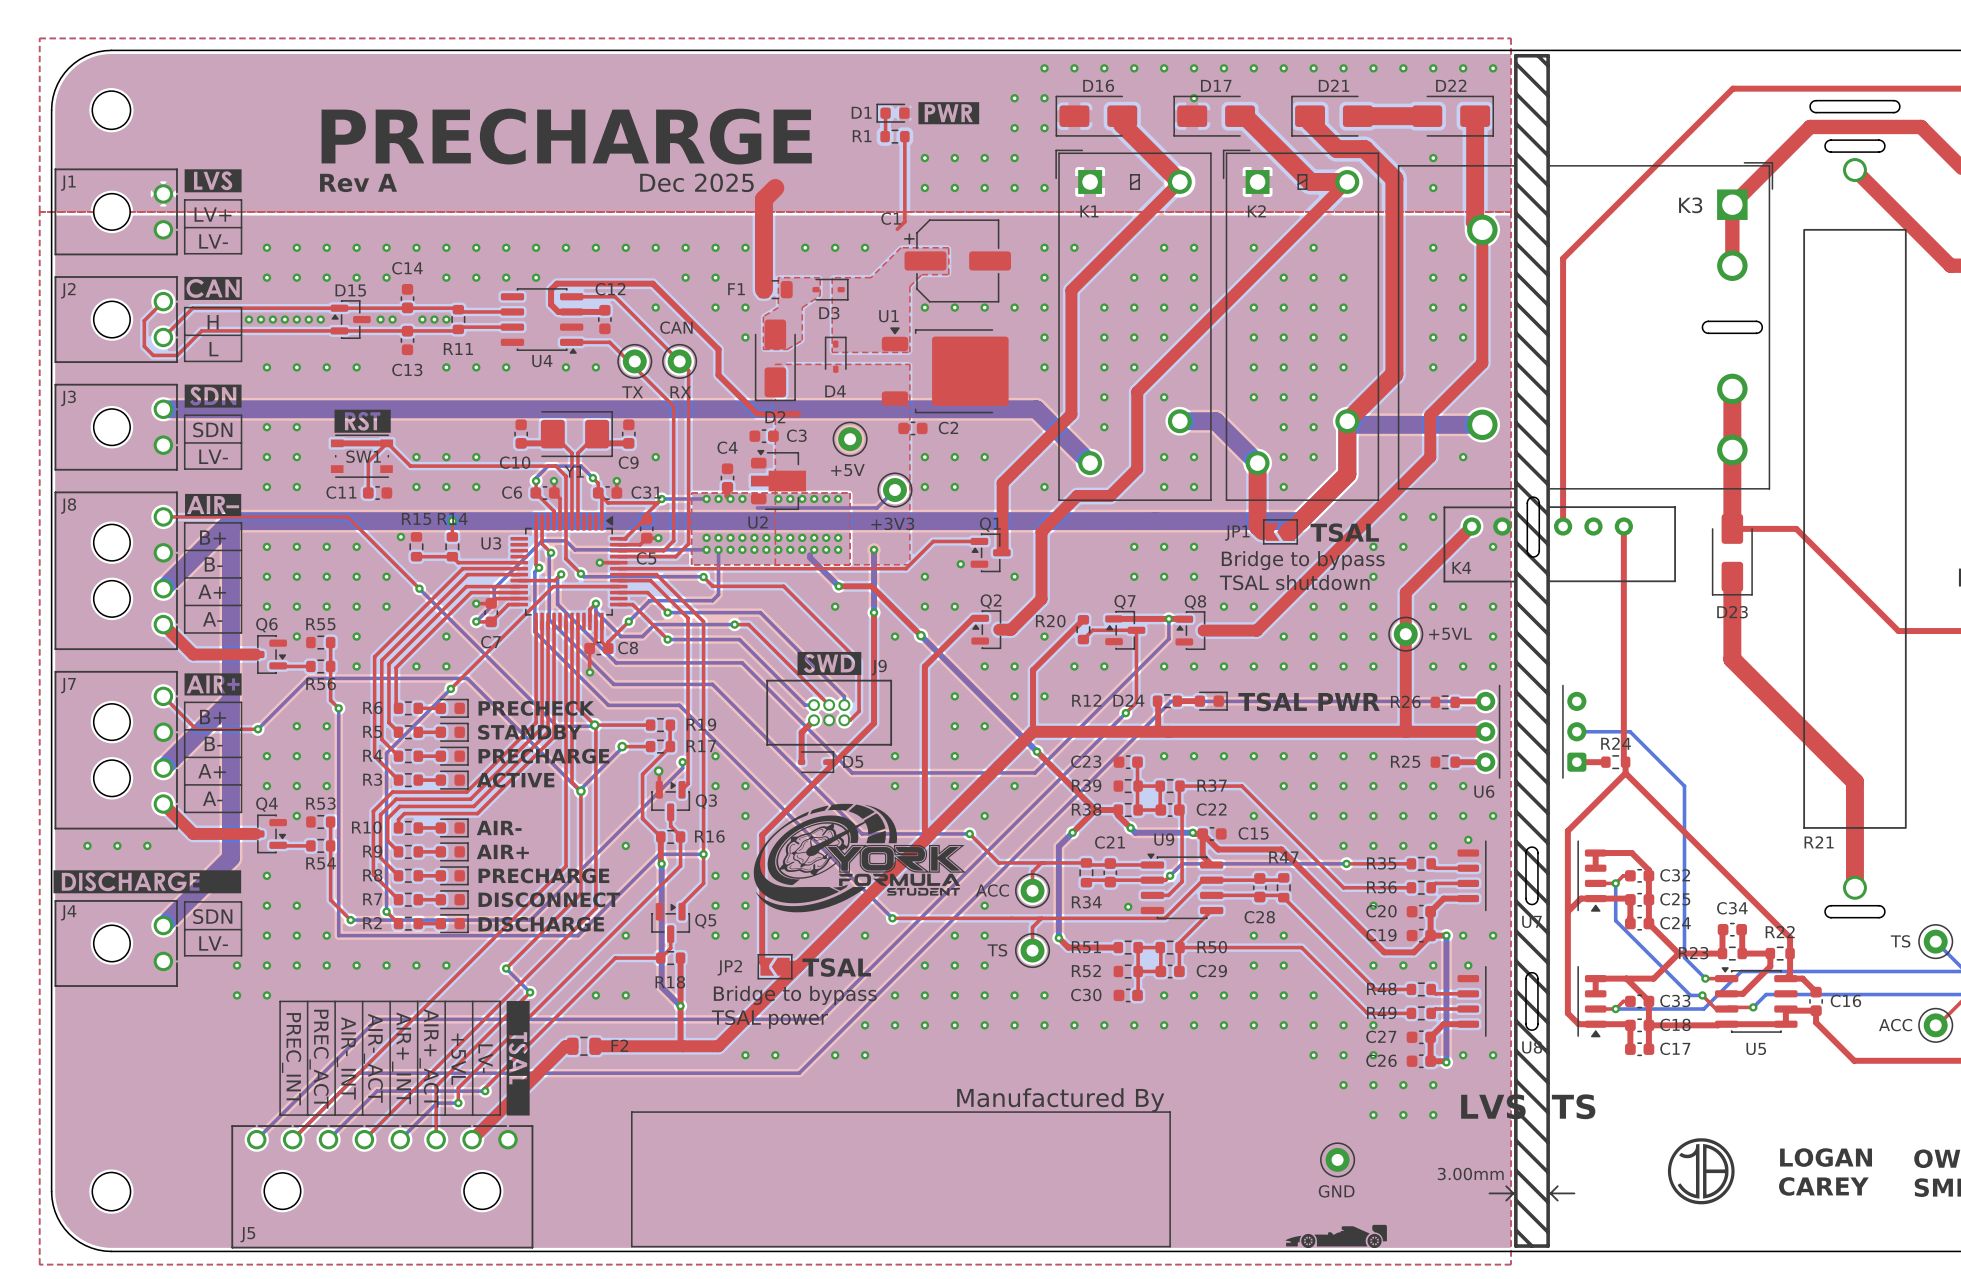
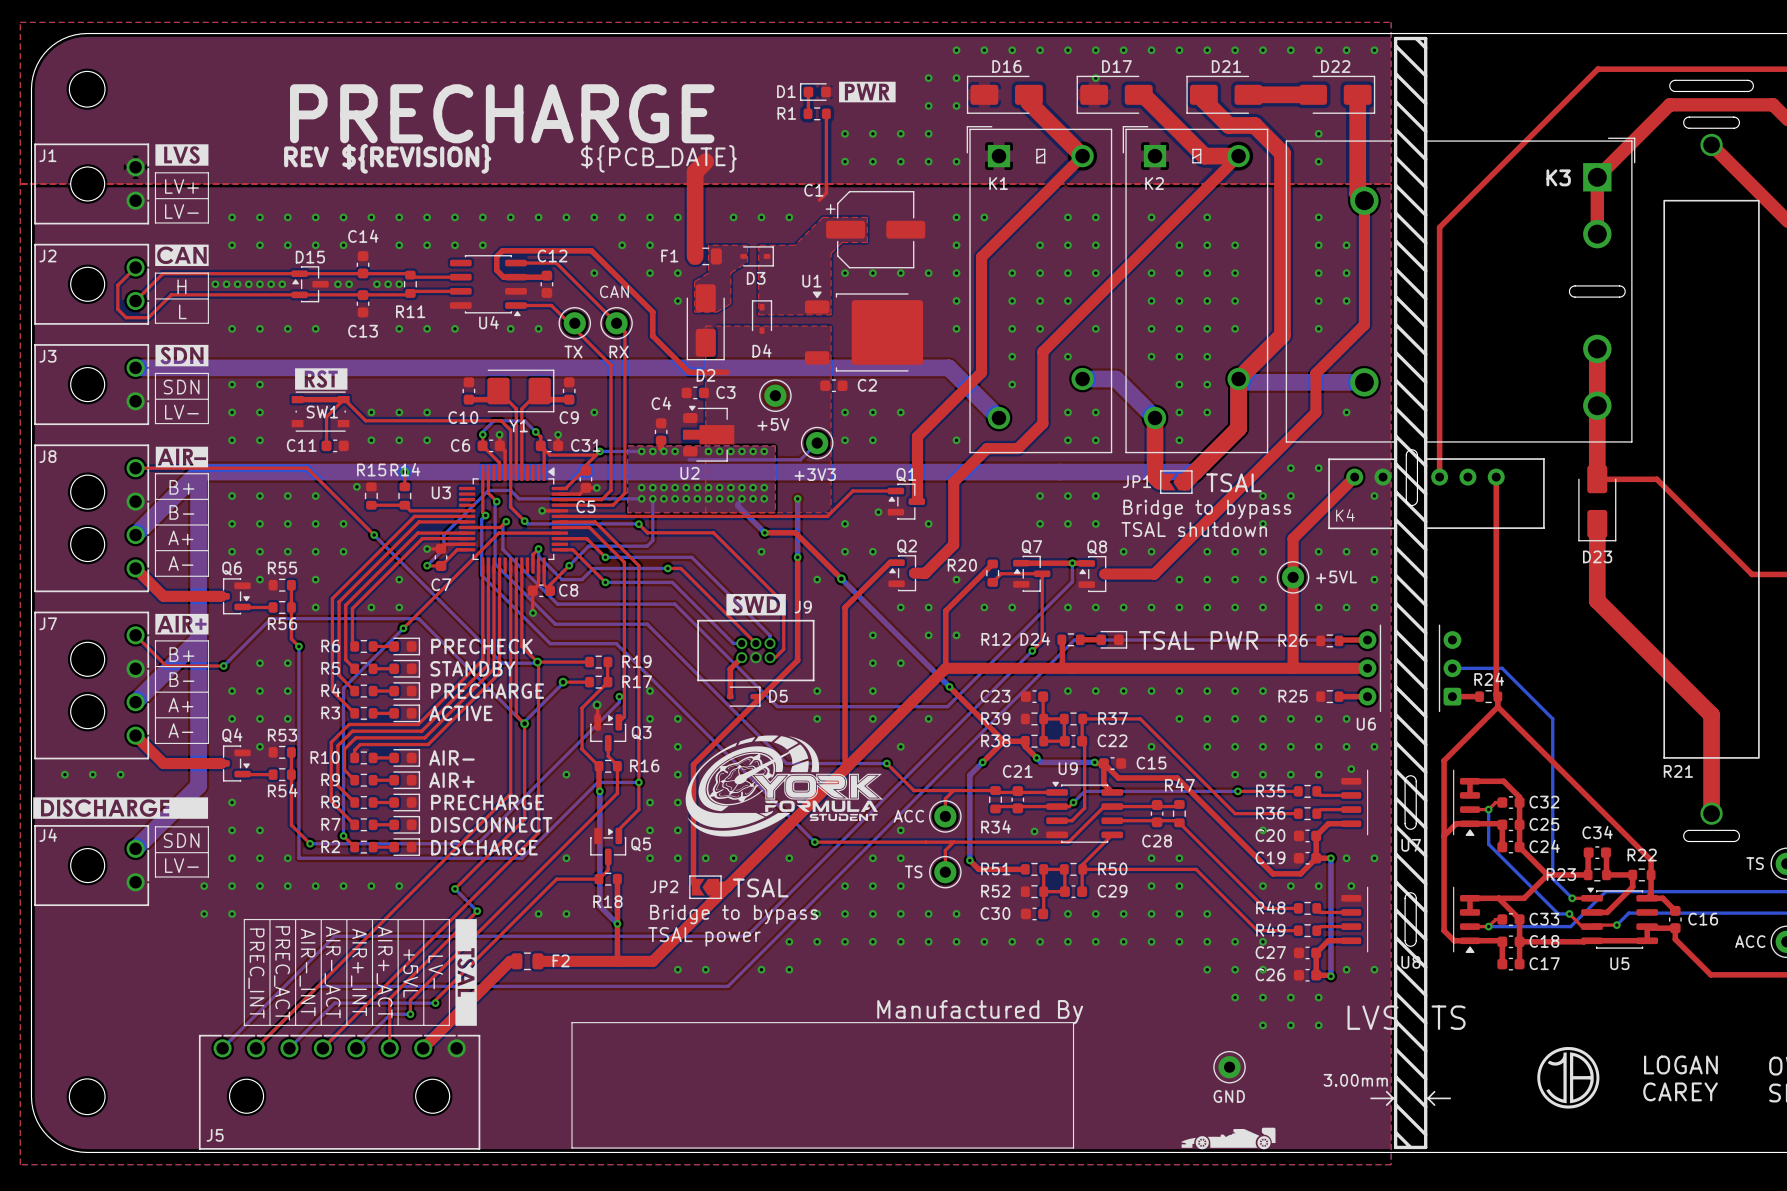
text: Rev A (358, 182) -> REV ${REVISION} (387, 158)
text: Dec 2025 (696, 182) -> ${PCB_DATE} (658, 158)

